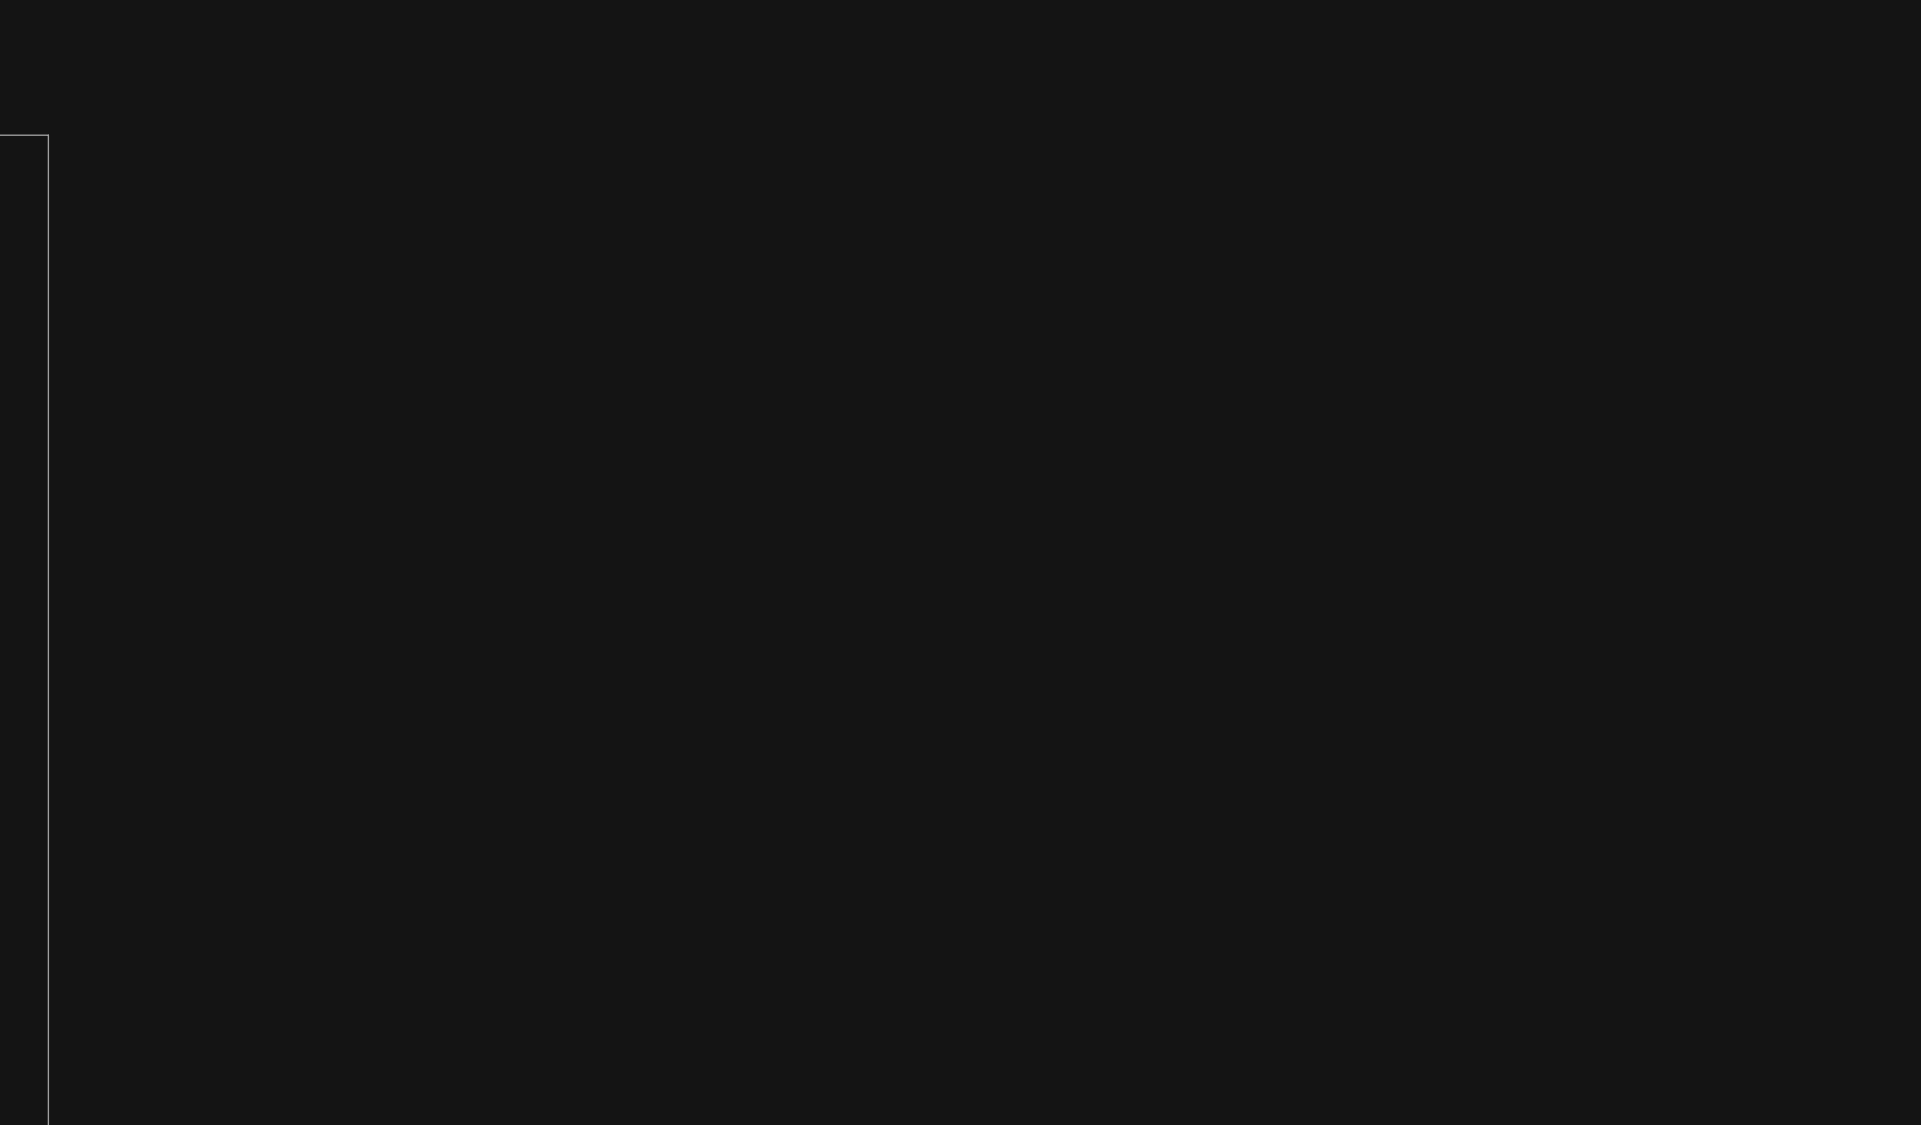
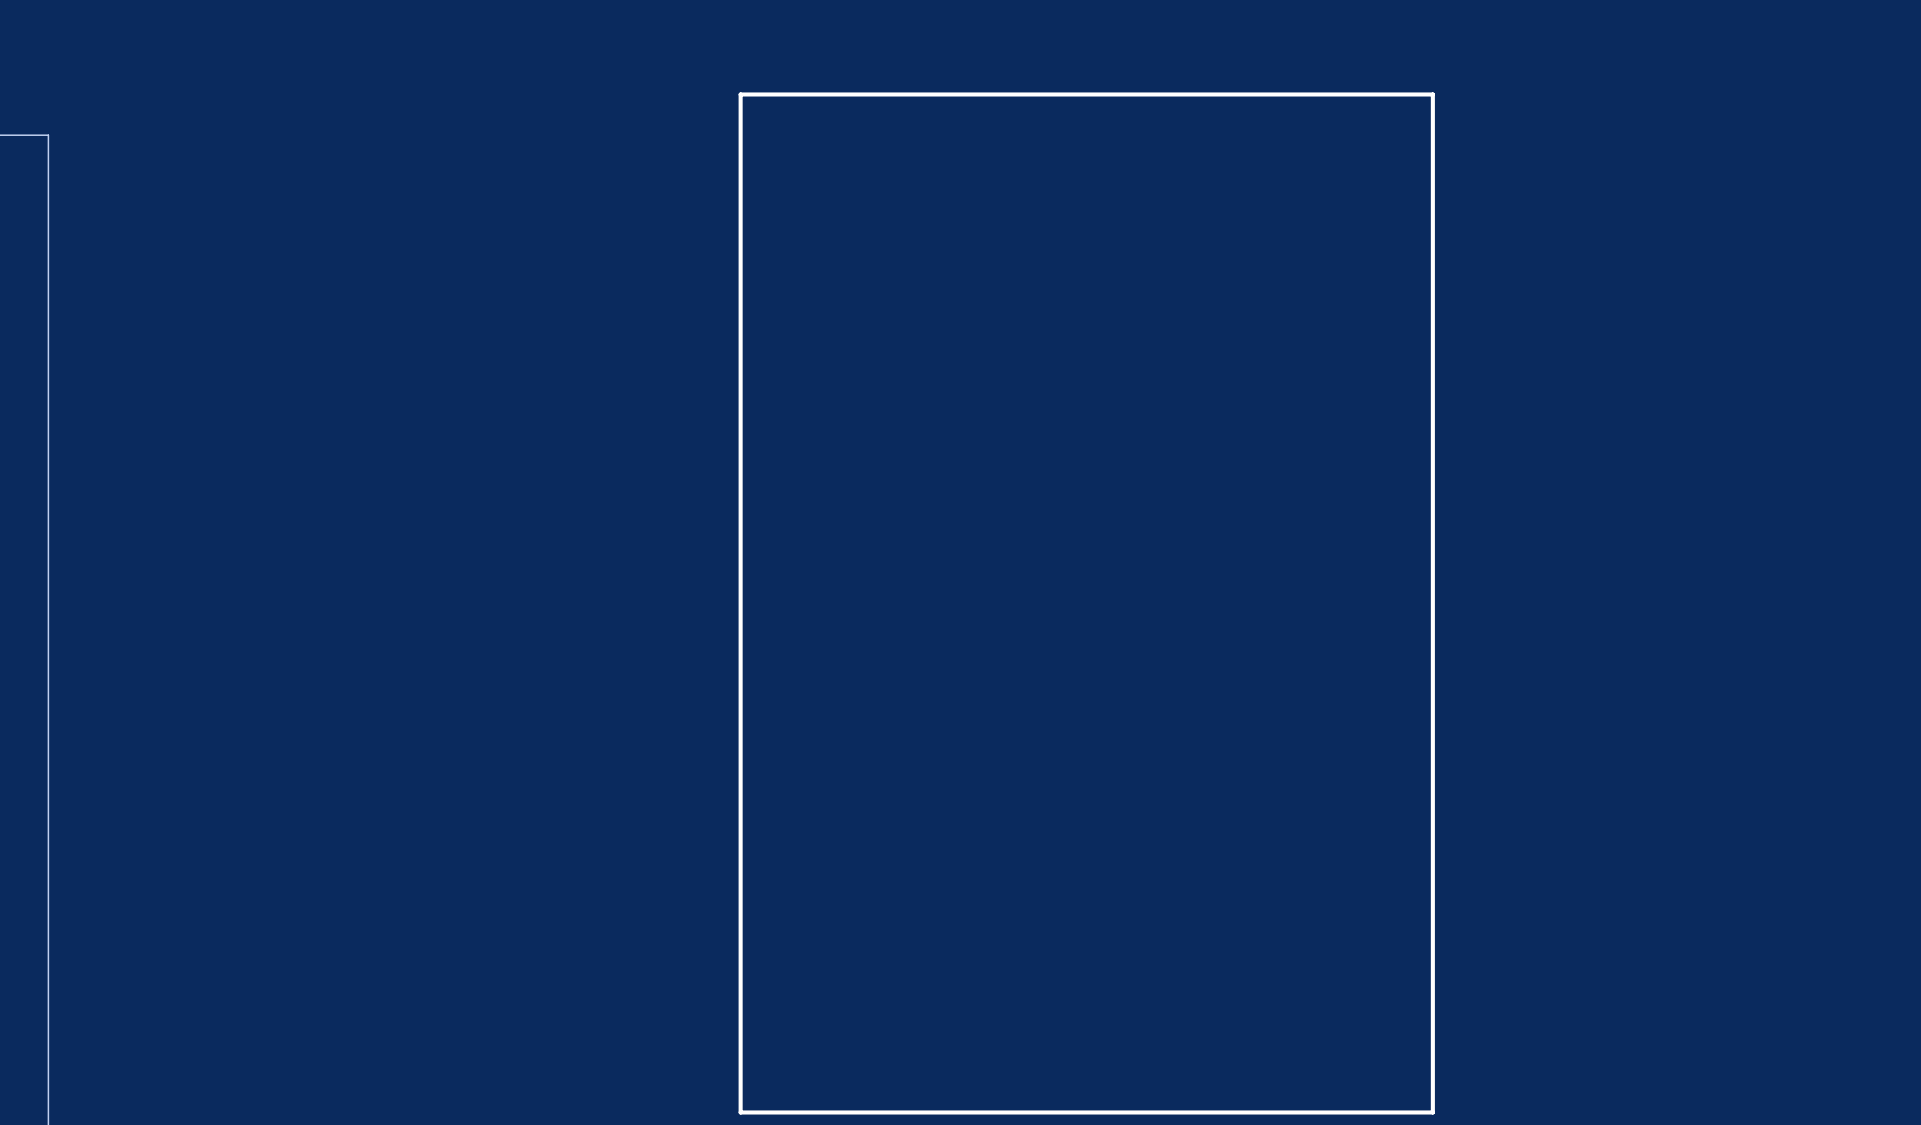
line: none -> (1432, 94) (740, 94) (740, 1112) (1432, 1112) (1432, 94)

